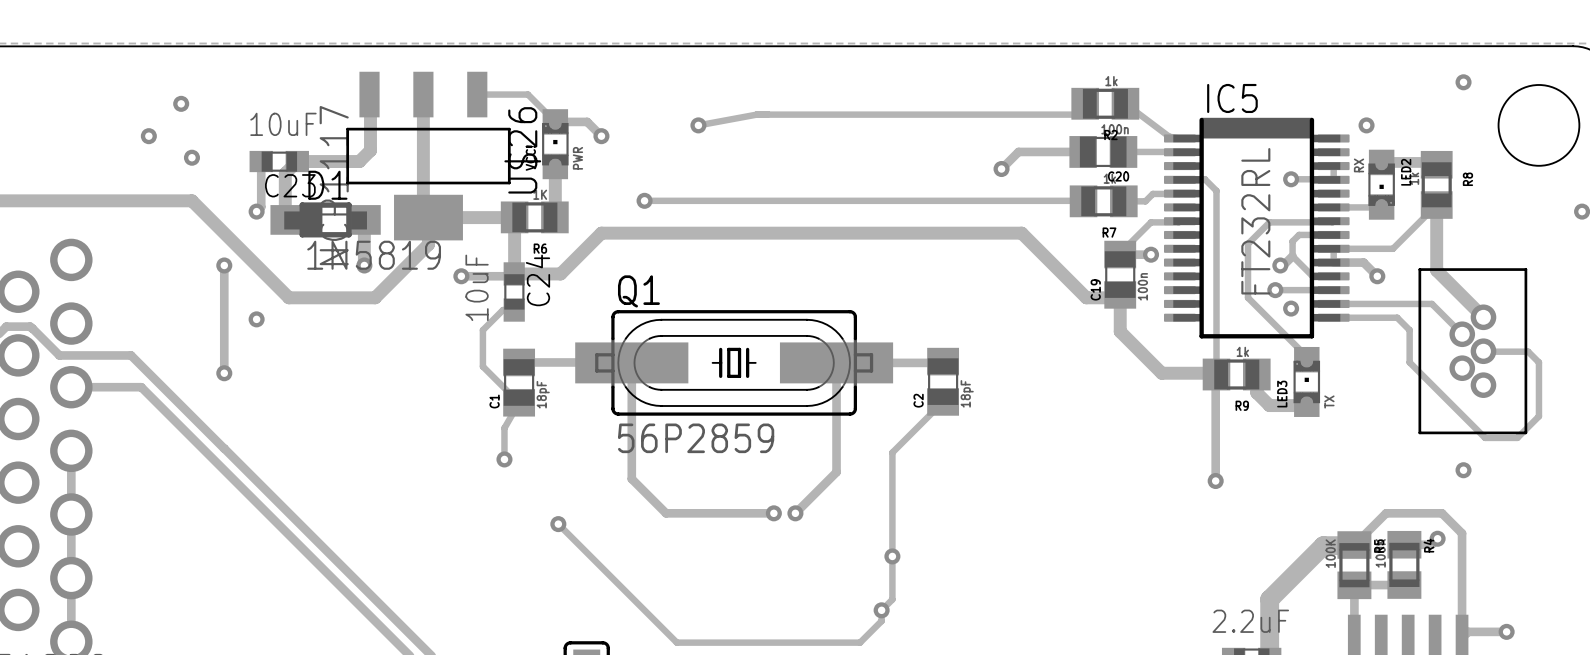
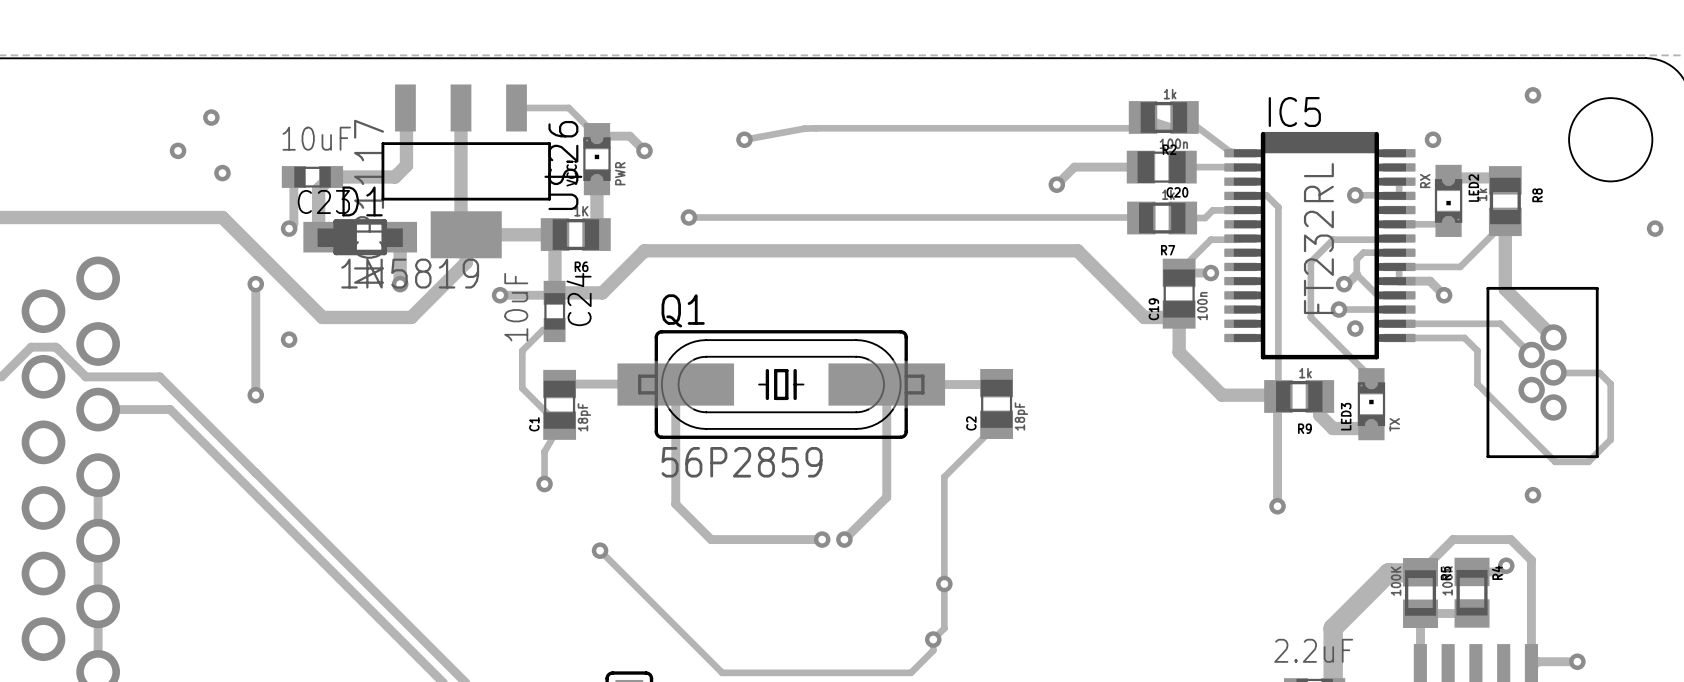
track: (1085, 103) (1074, 114) (756, 114) -> (1143, 117) (1176, 128) (816, 128)

